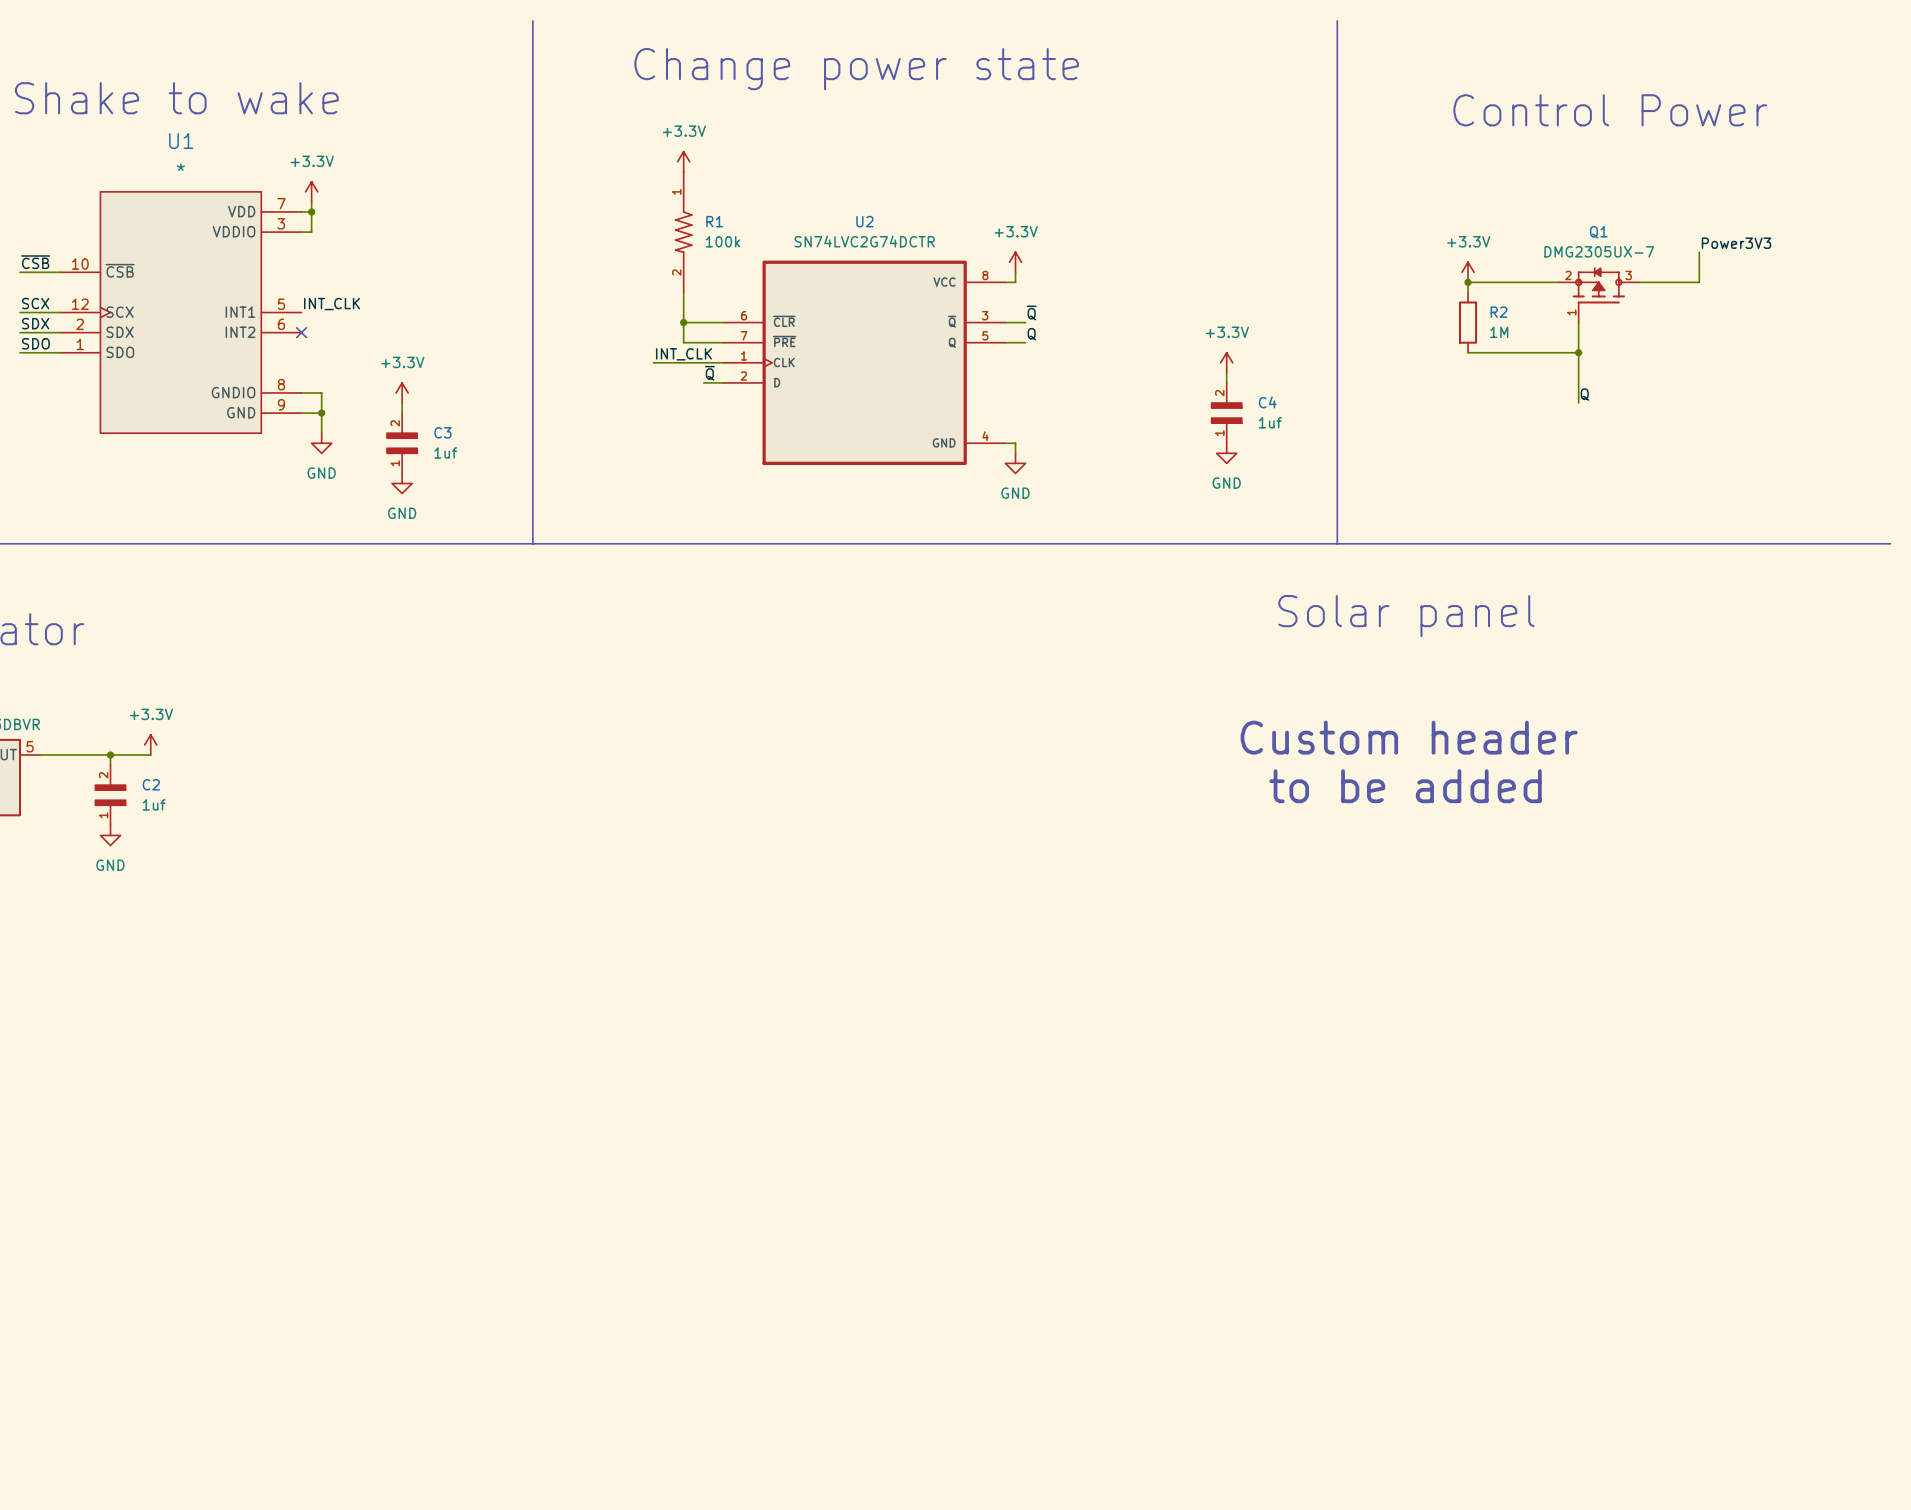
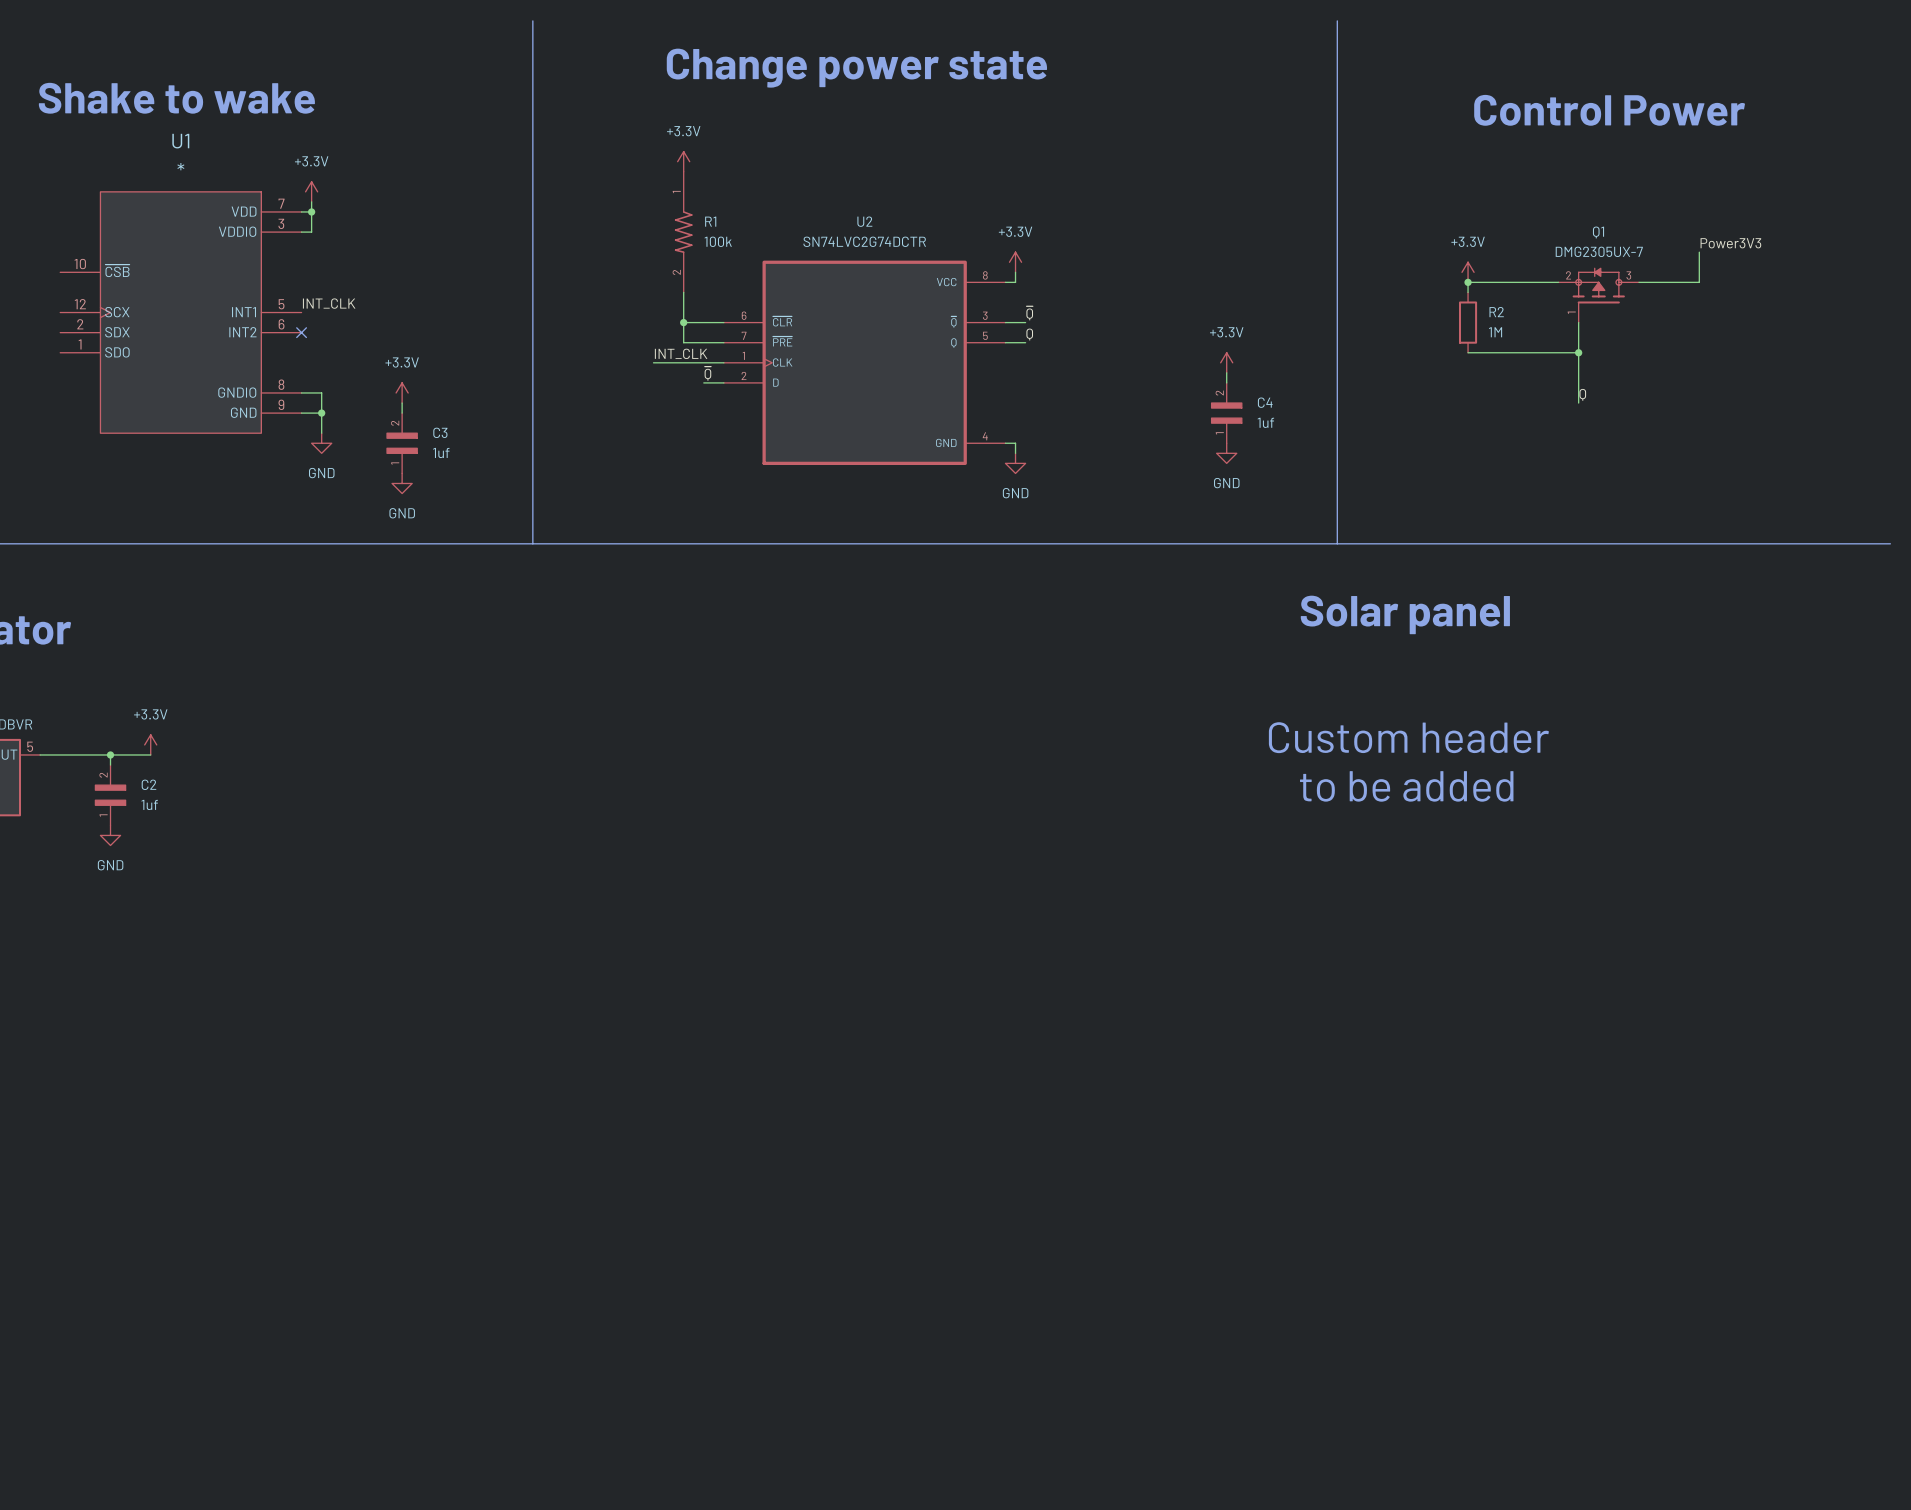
label: ~{CSB} (35, 262) -> none
wire: (20, 272) (60, 272) -> none
label: SCX (35, 303) -> none
wire: (20, 312) (60, 312) -> none
label: SDX (35, 323) -> none
wire: (20, 332) (60, 332) -> none
label: SDO (35, 343) -> none
wire: (20, 352) (60, 352) -> none

